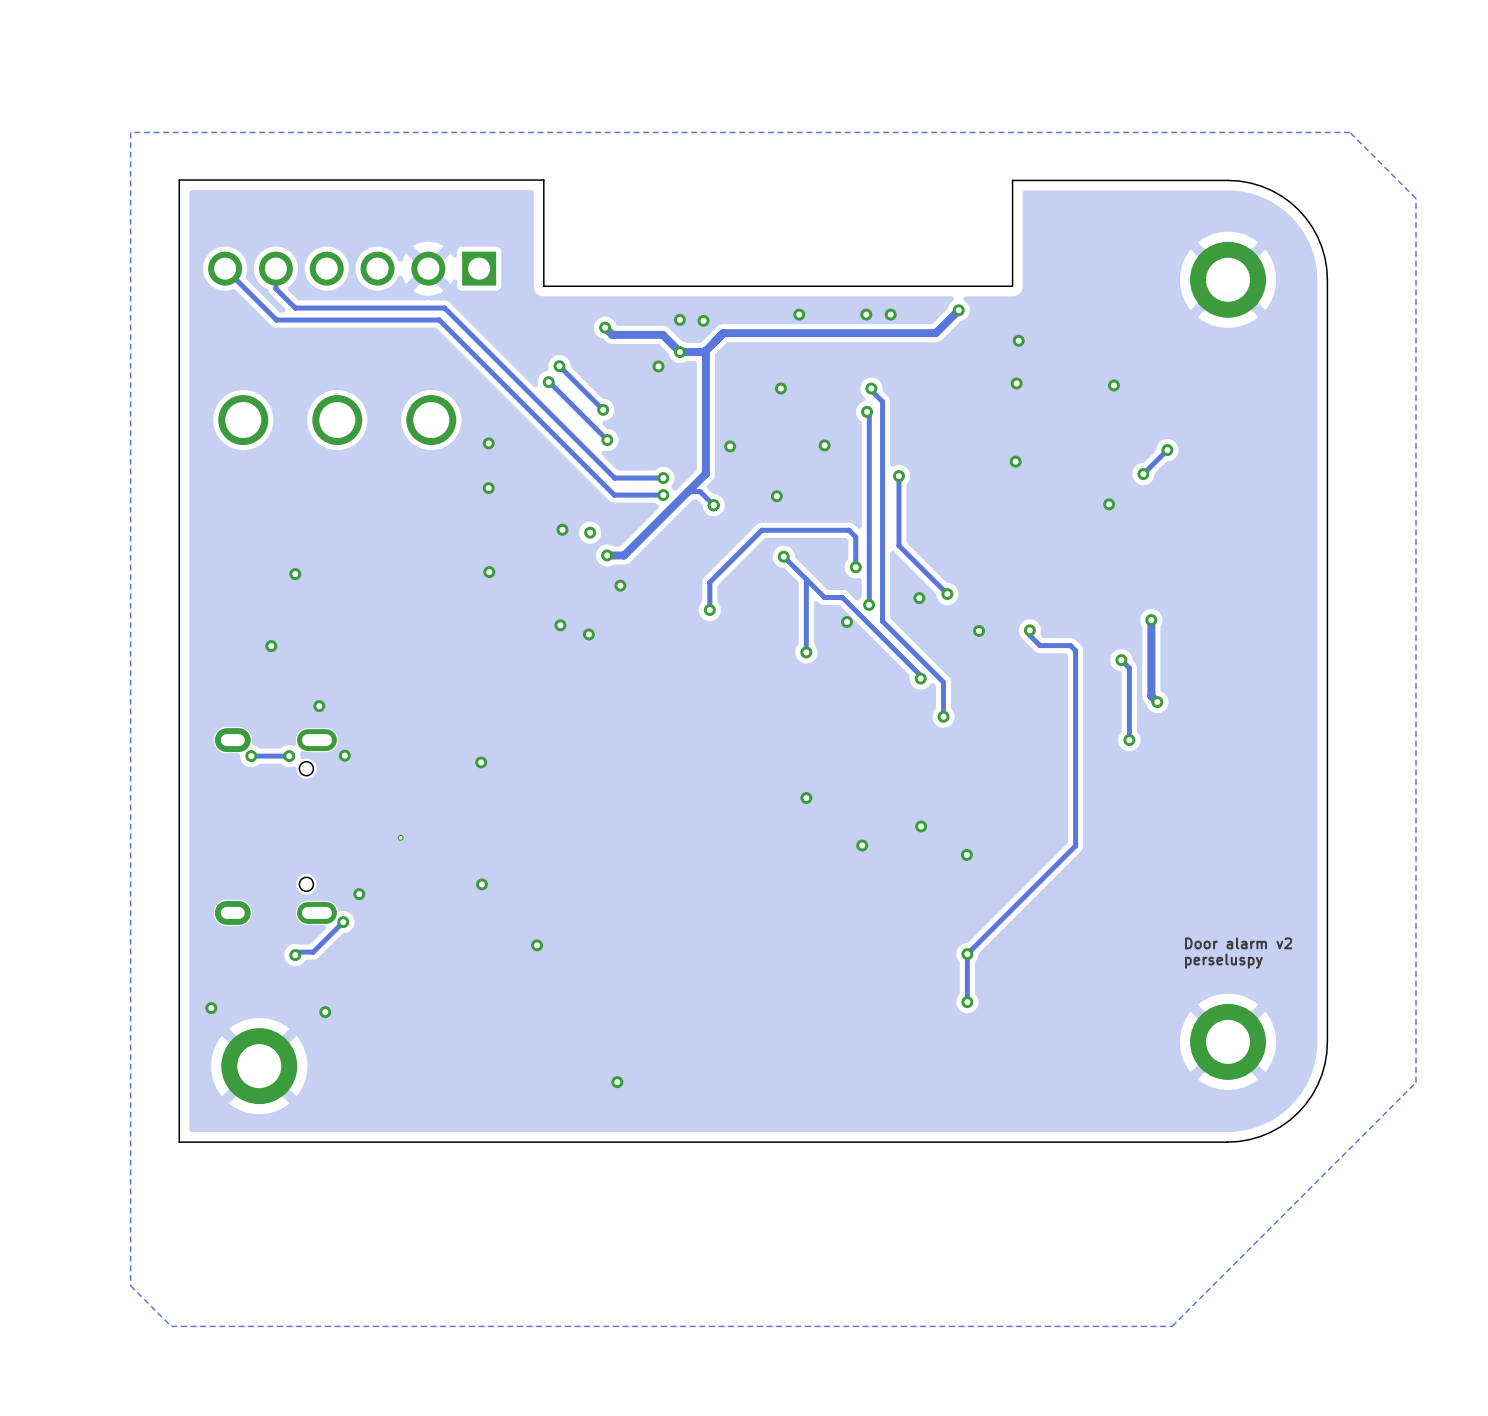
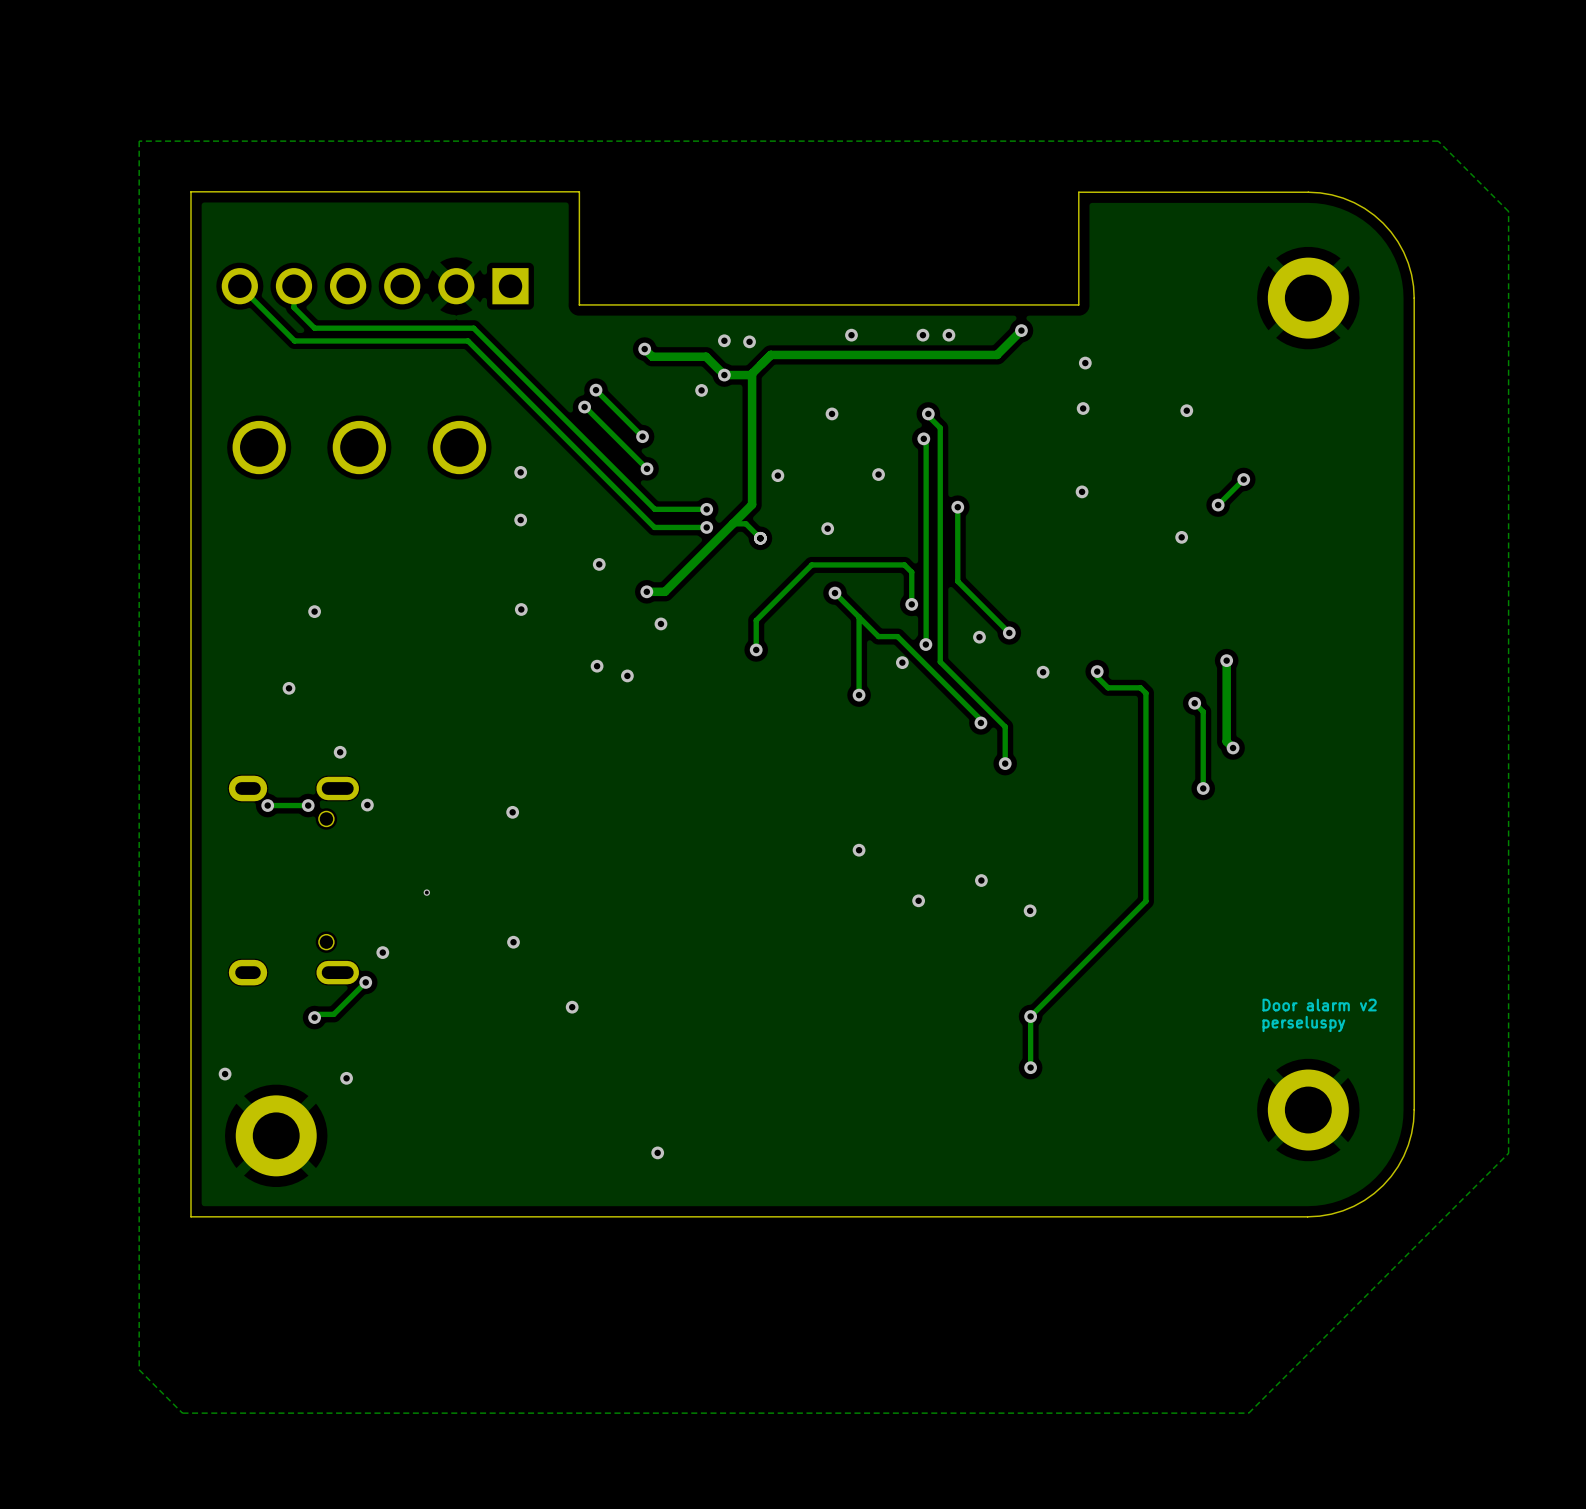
via: (590, 532) -> none

